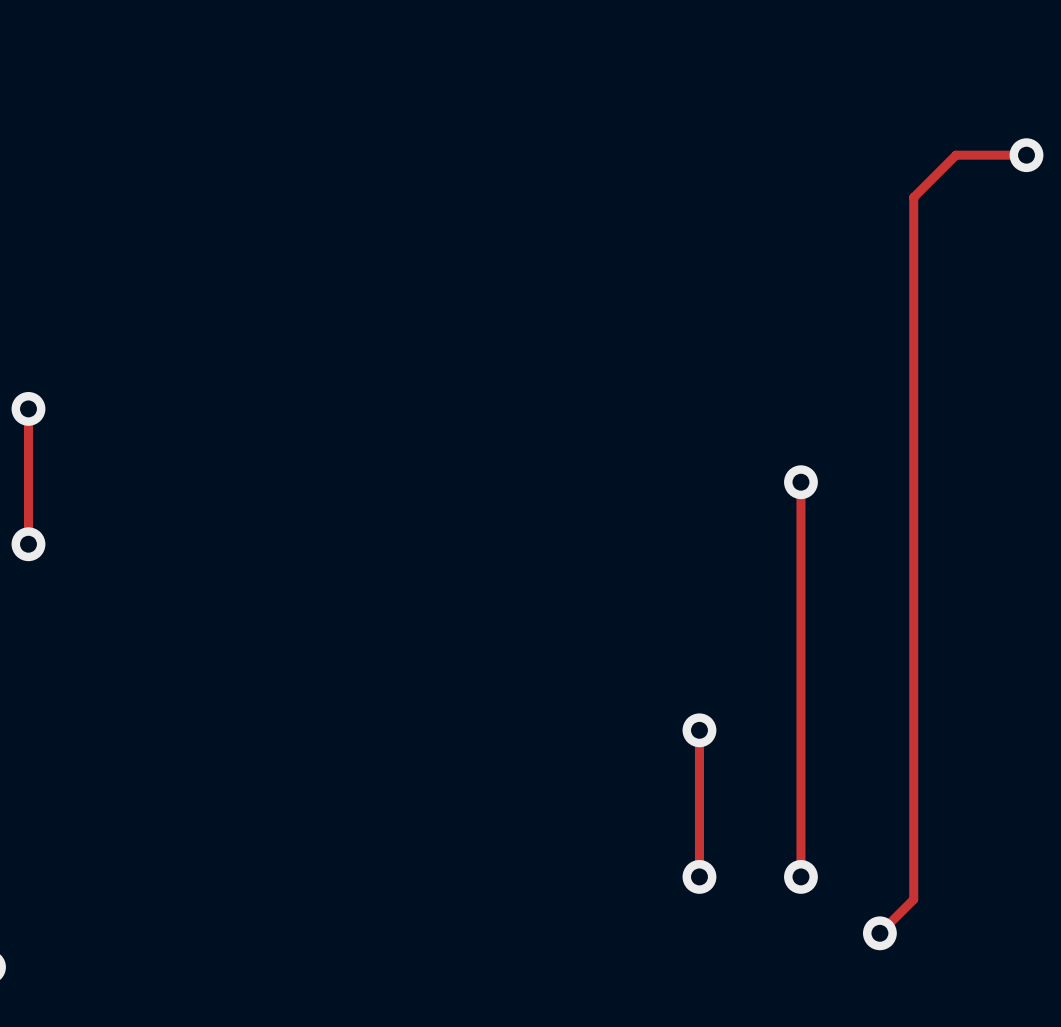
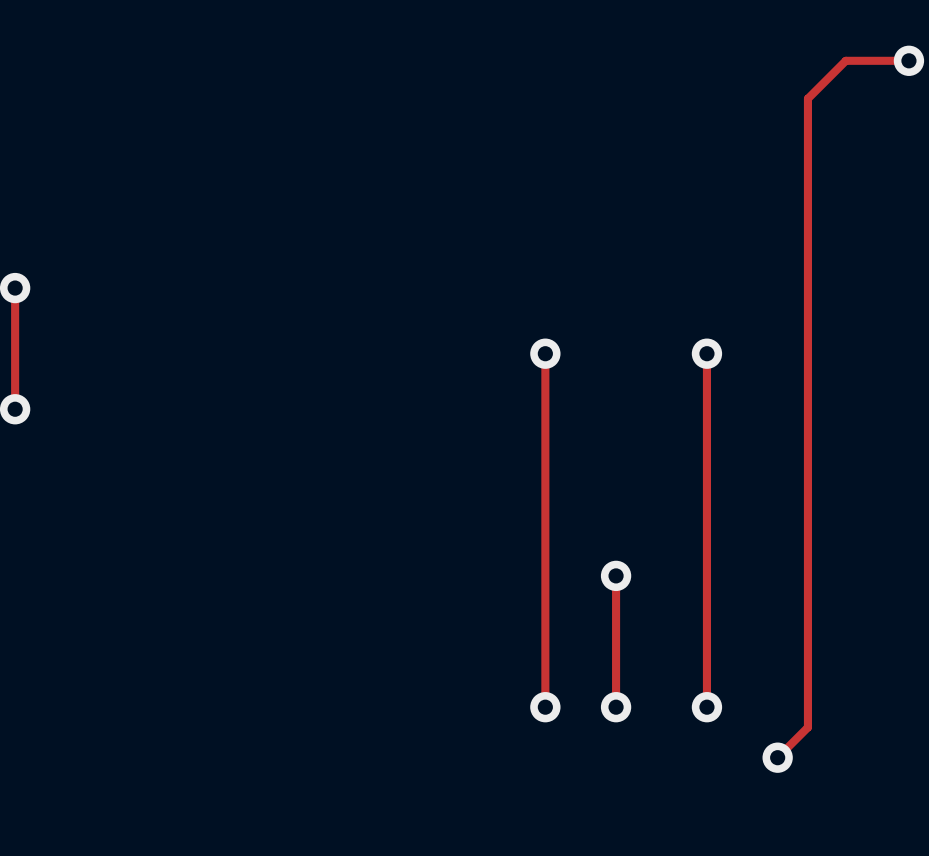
track: none -> (545, 353) (545, 707)
via: none -> (545, 353)
via: none -> (545, 707)

